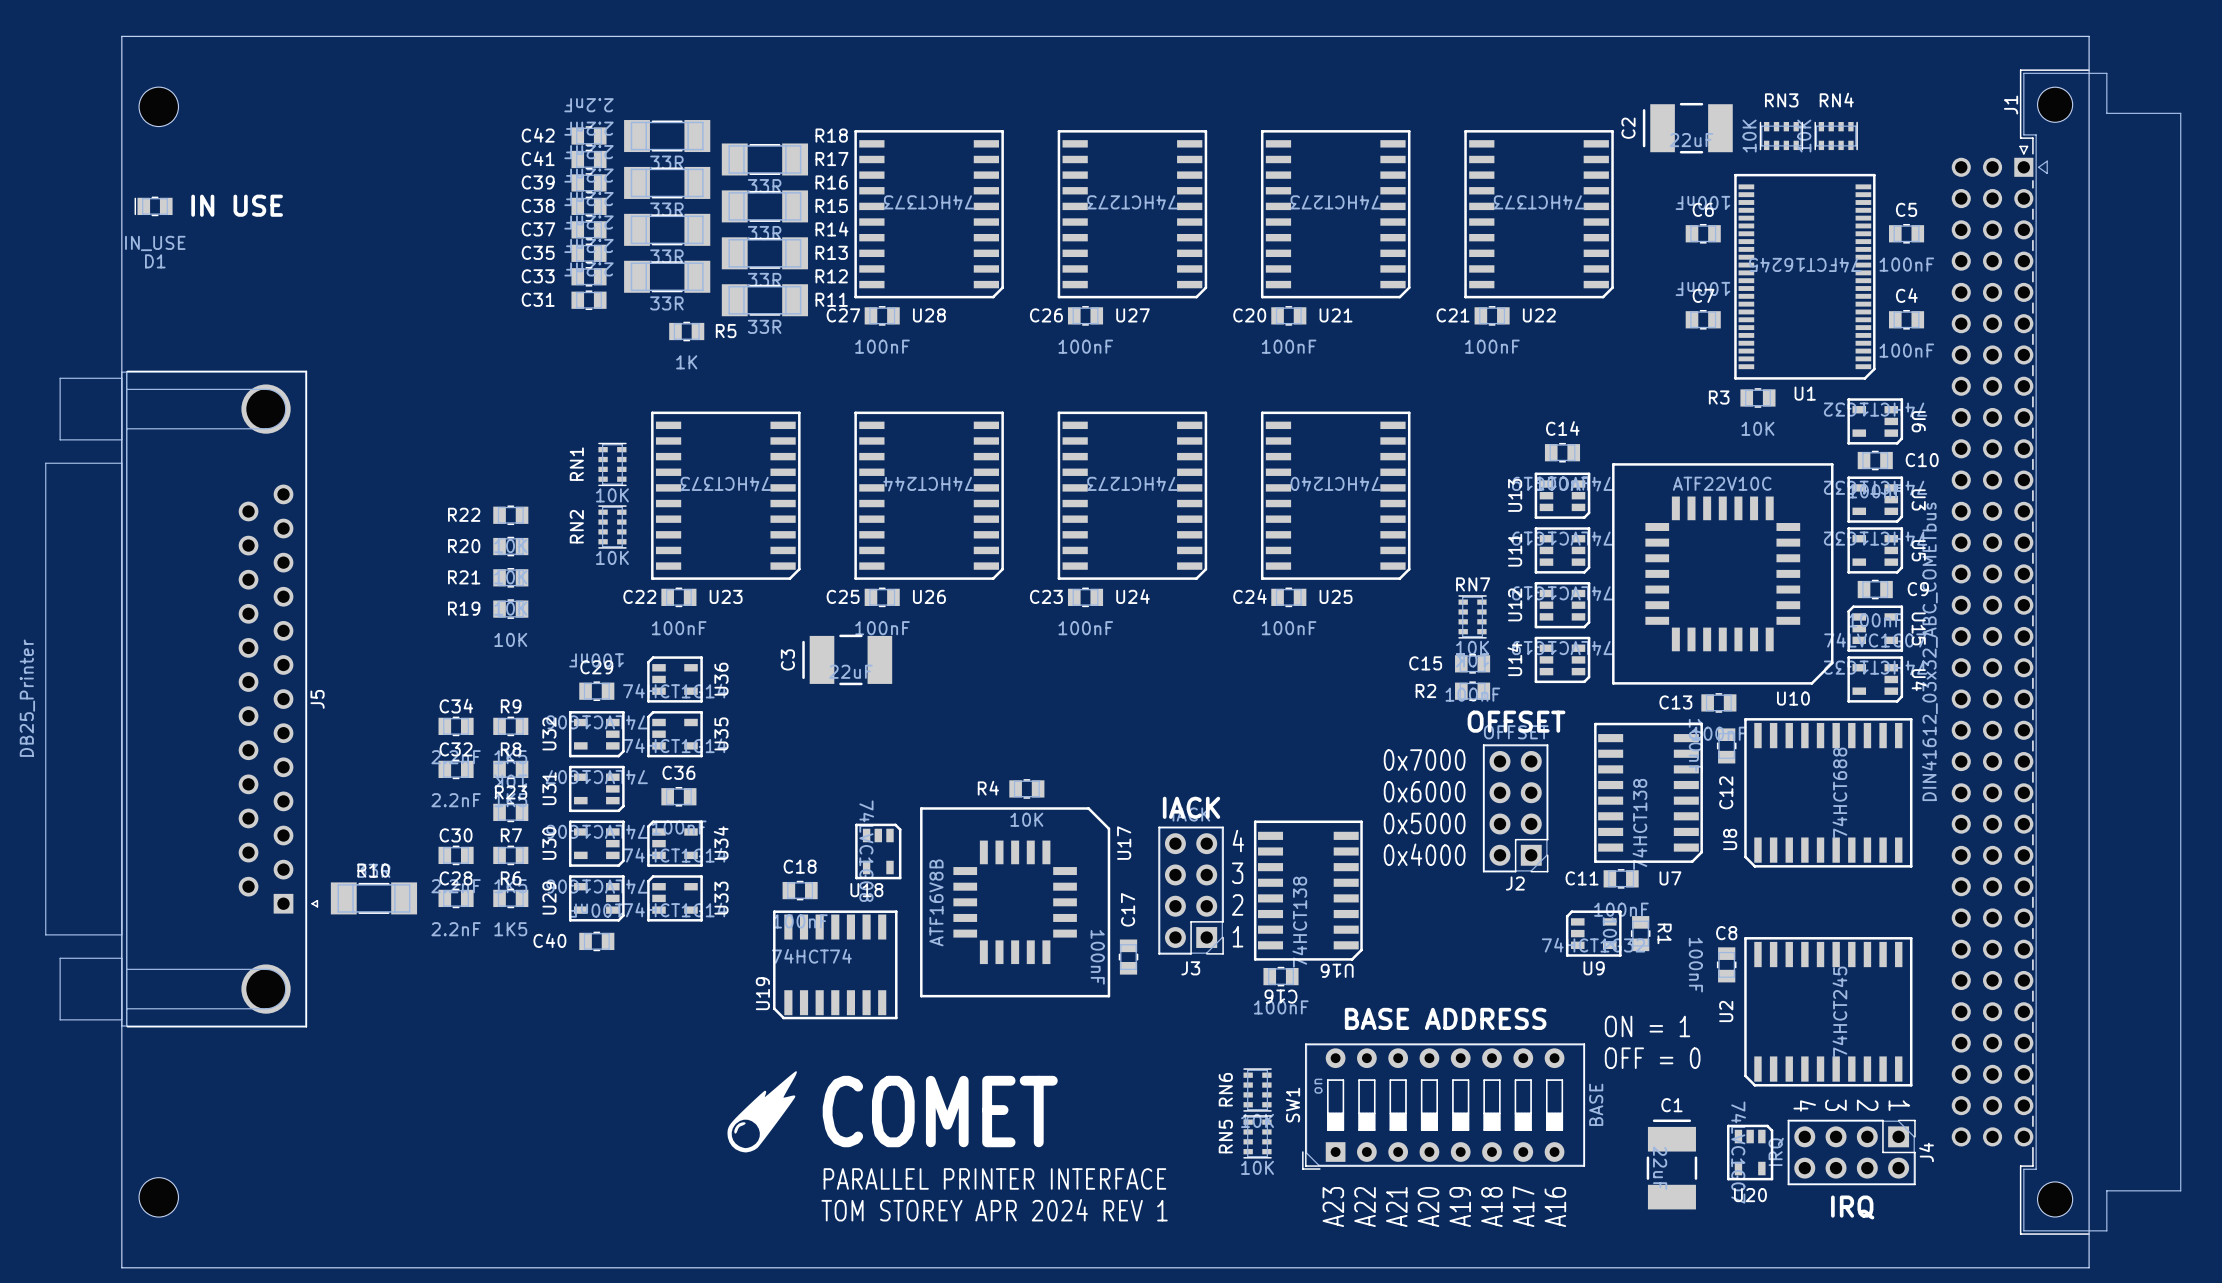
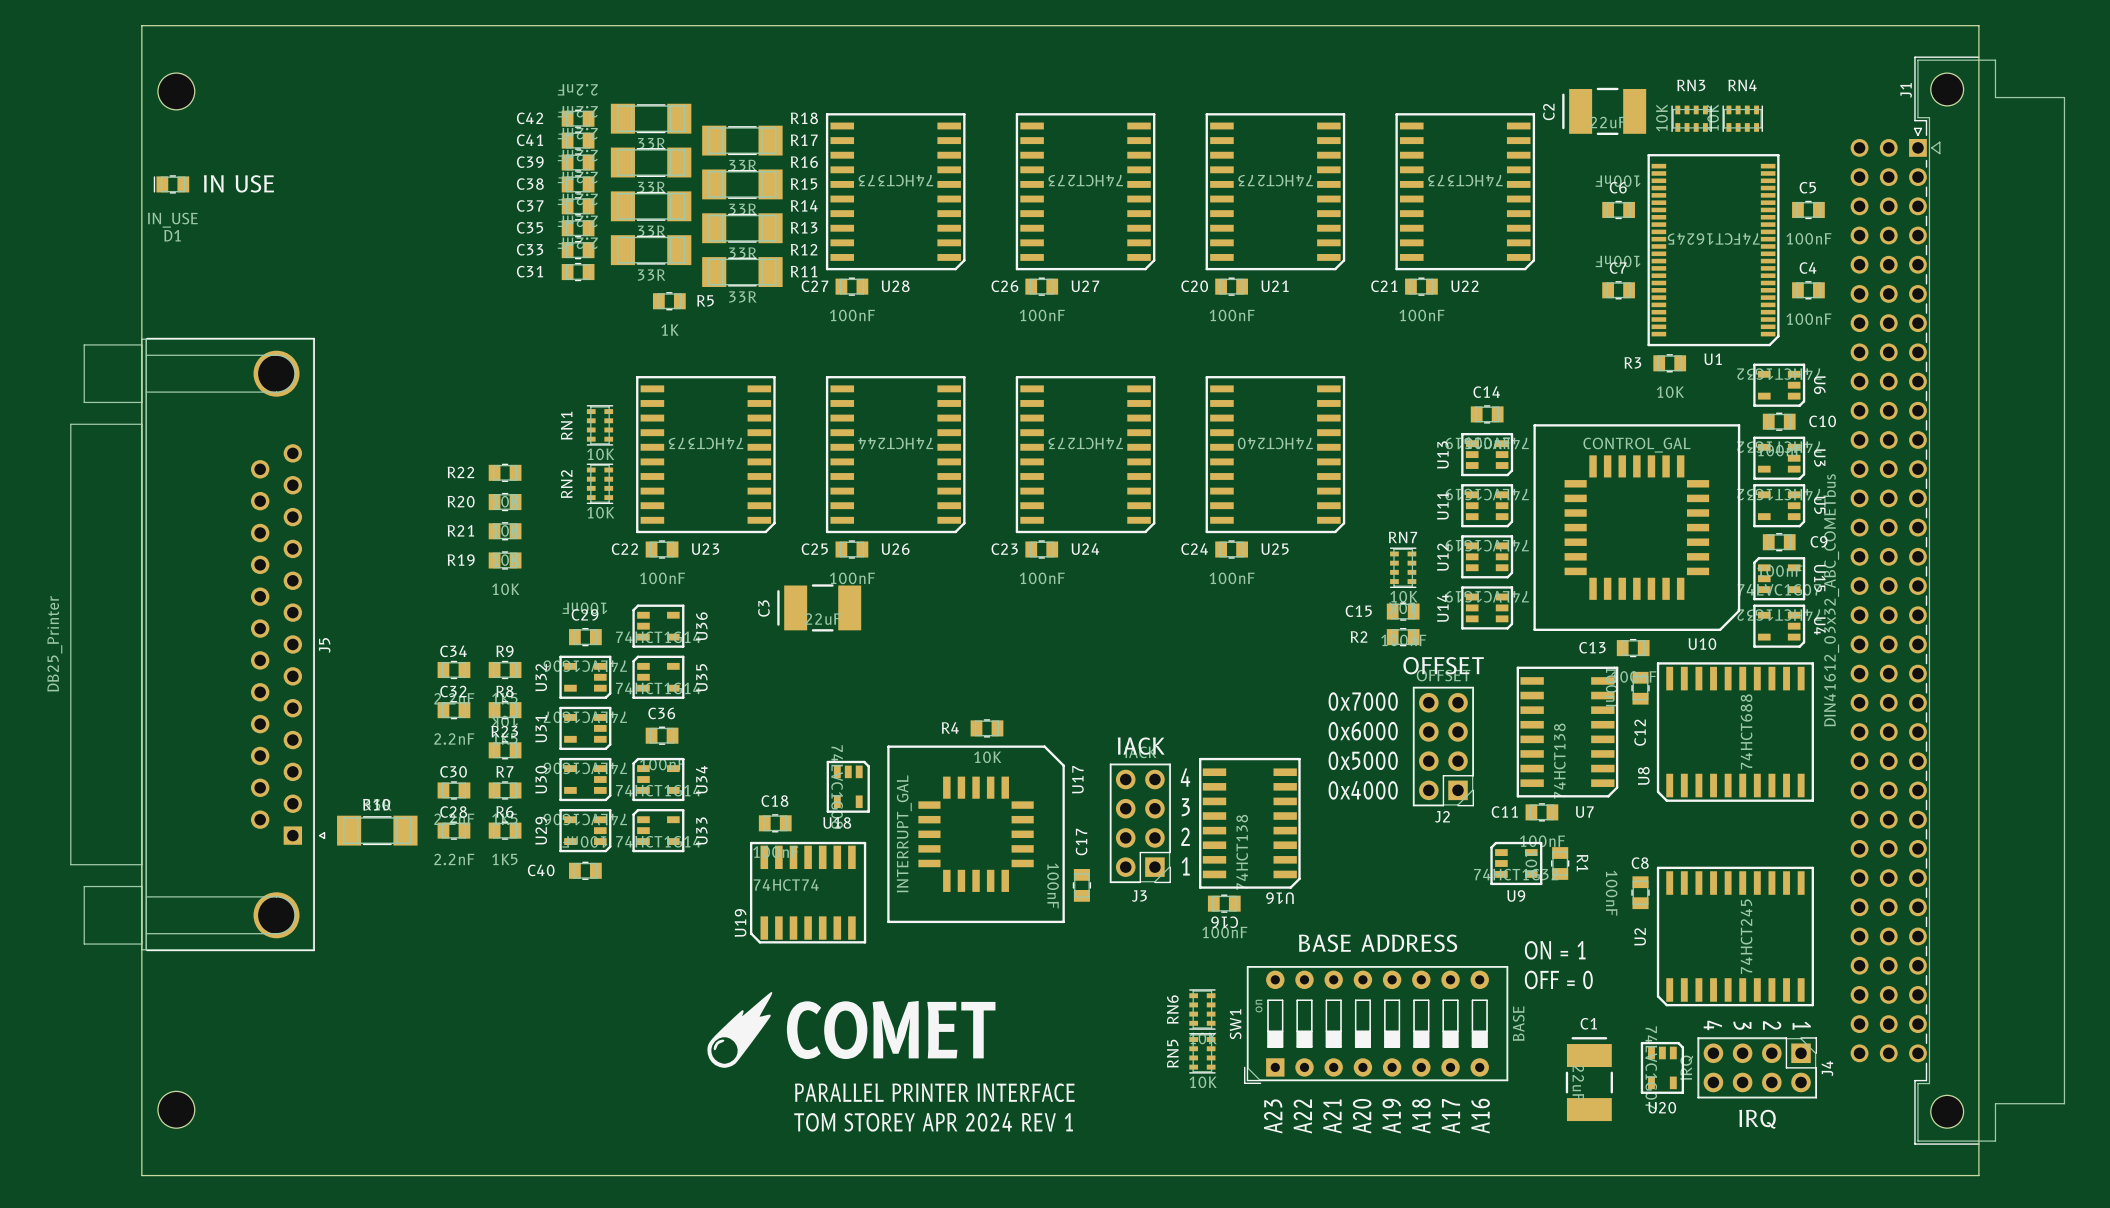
U10 value: ATF22V10C (1722, 483) -> CONTROL_GAL (1636, 445)
U17 value: ATF16V8B (936, 902) -> INTERRUPT_GAL (904, 833)

